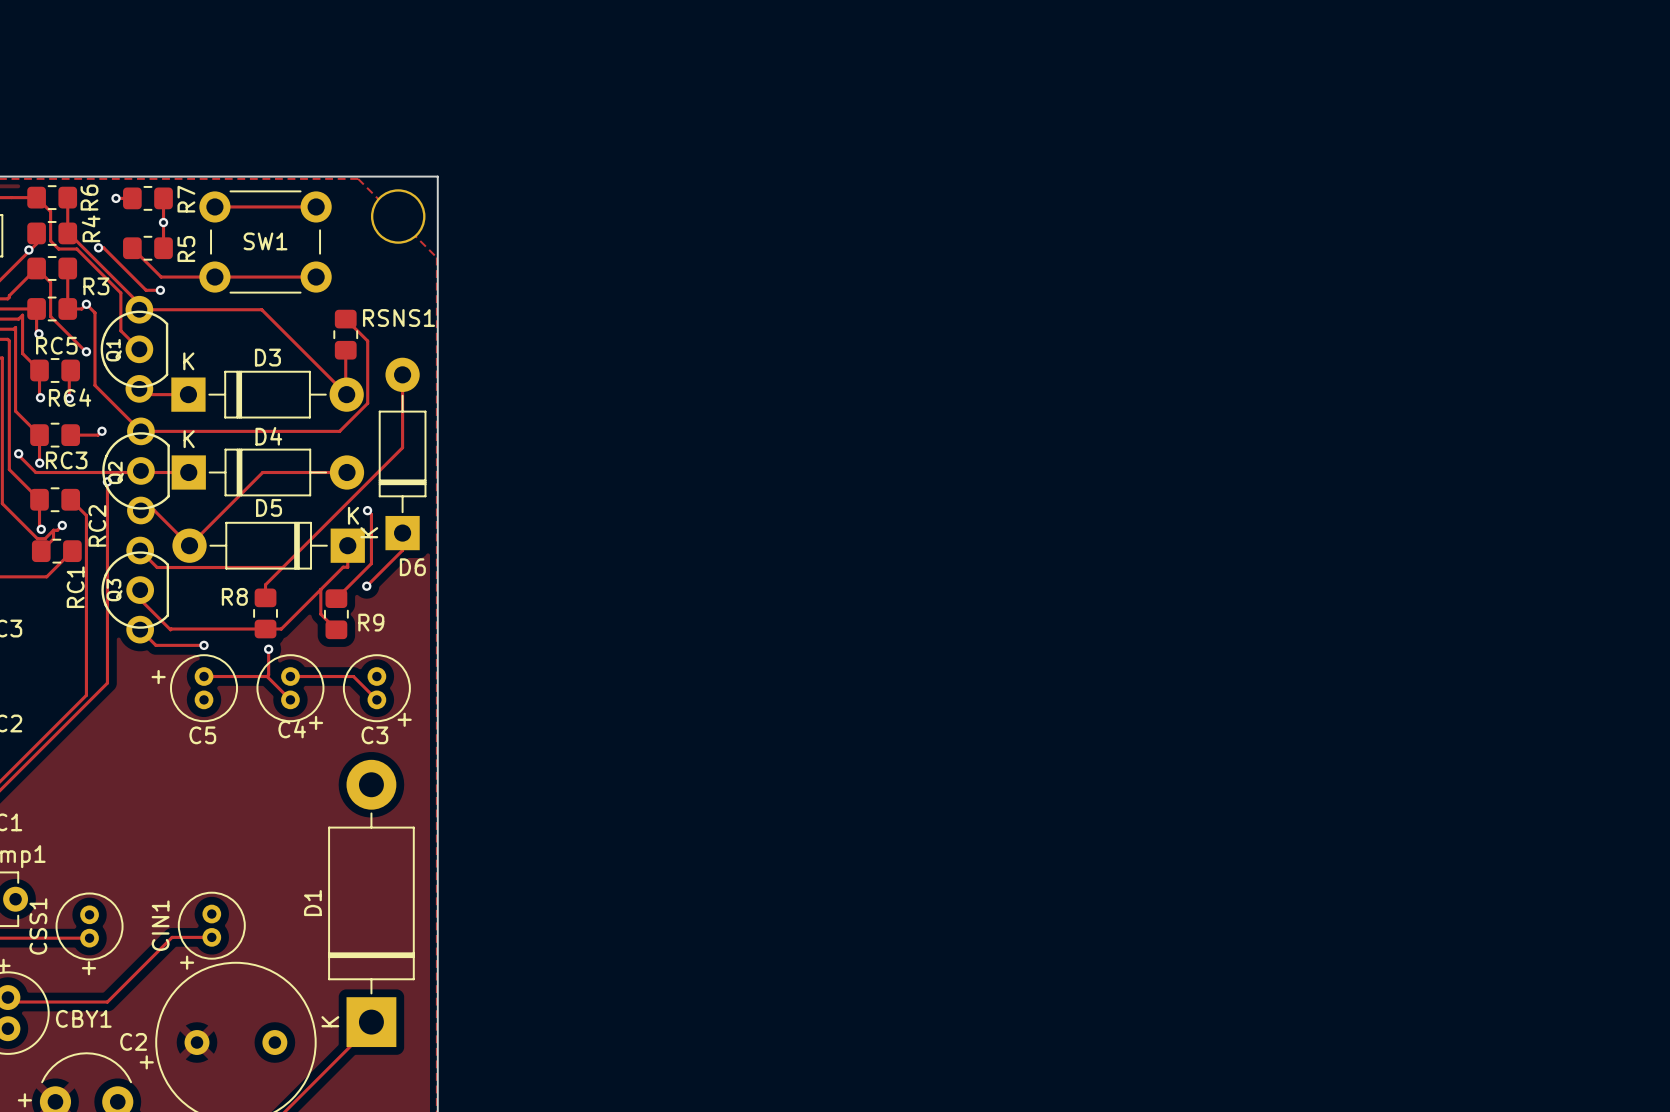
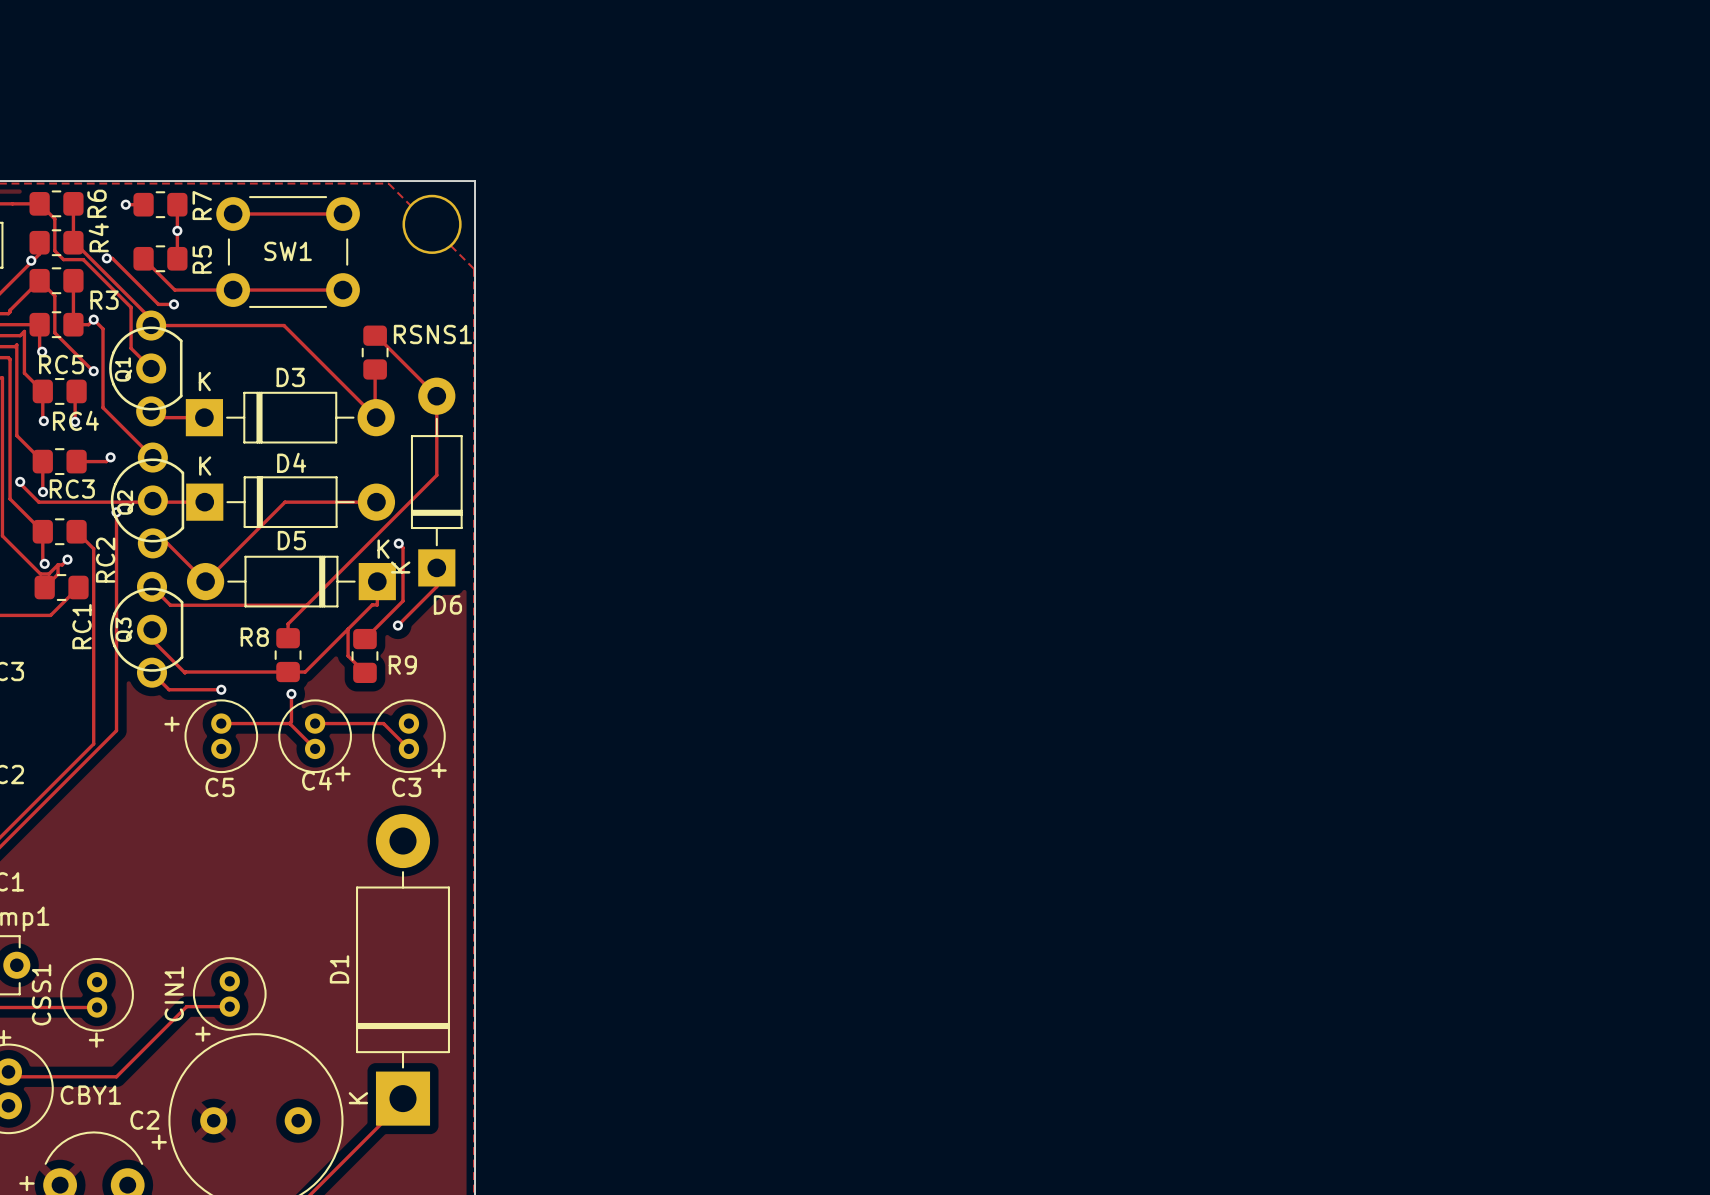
track: (345, 319) (367, 341) (367, 403) (339, 431) (140, 431) -> (375, 335) (436, 396)

